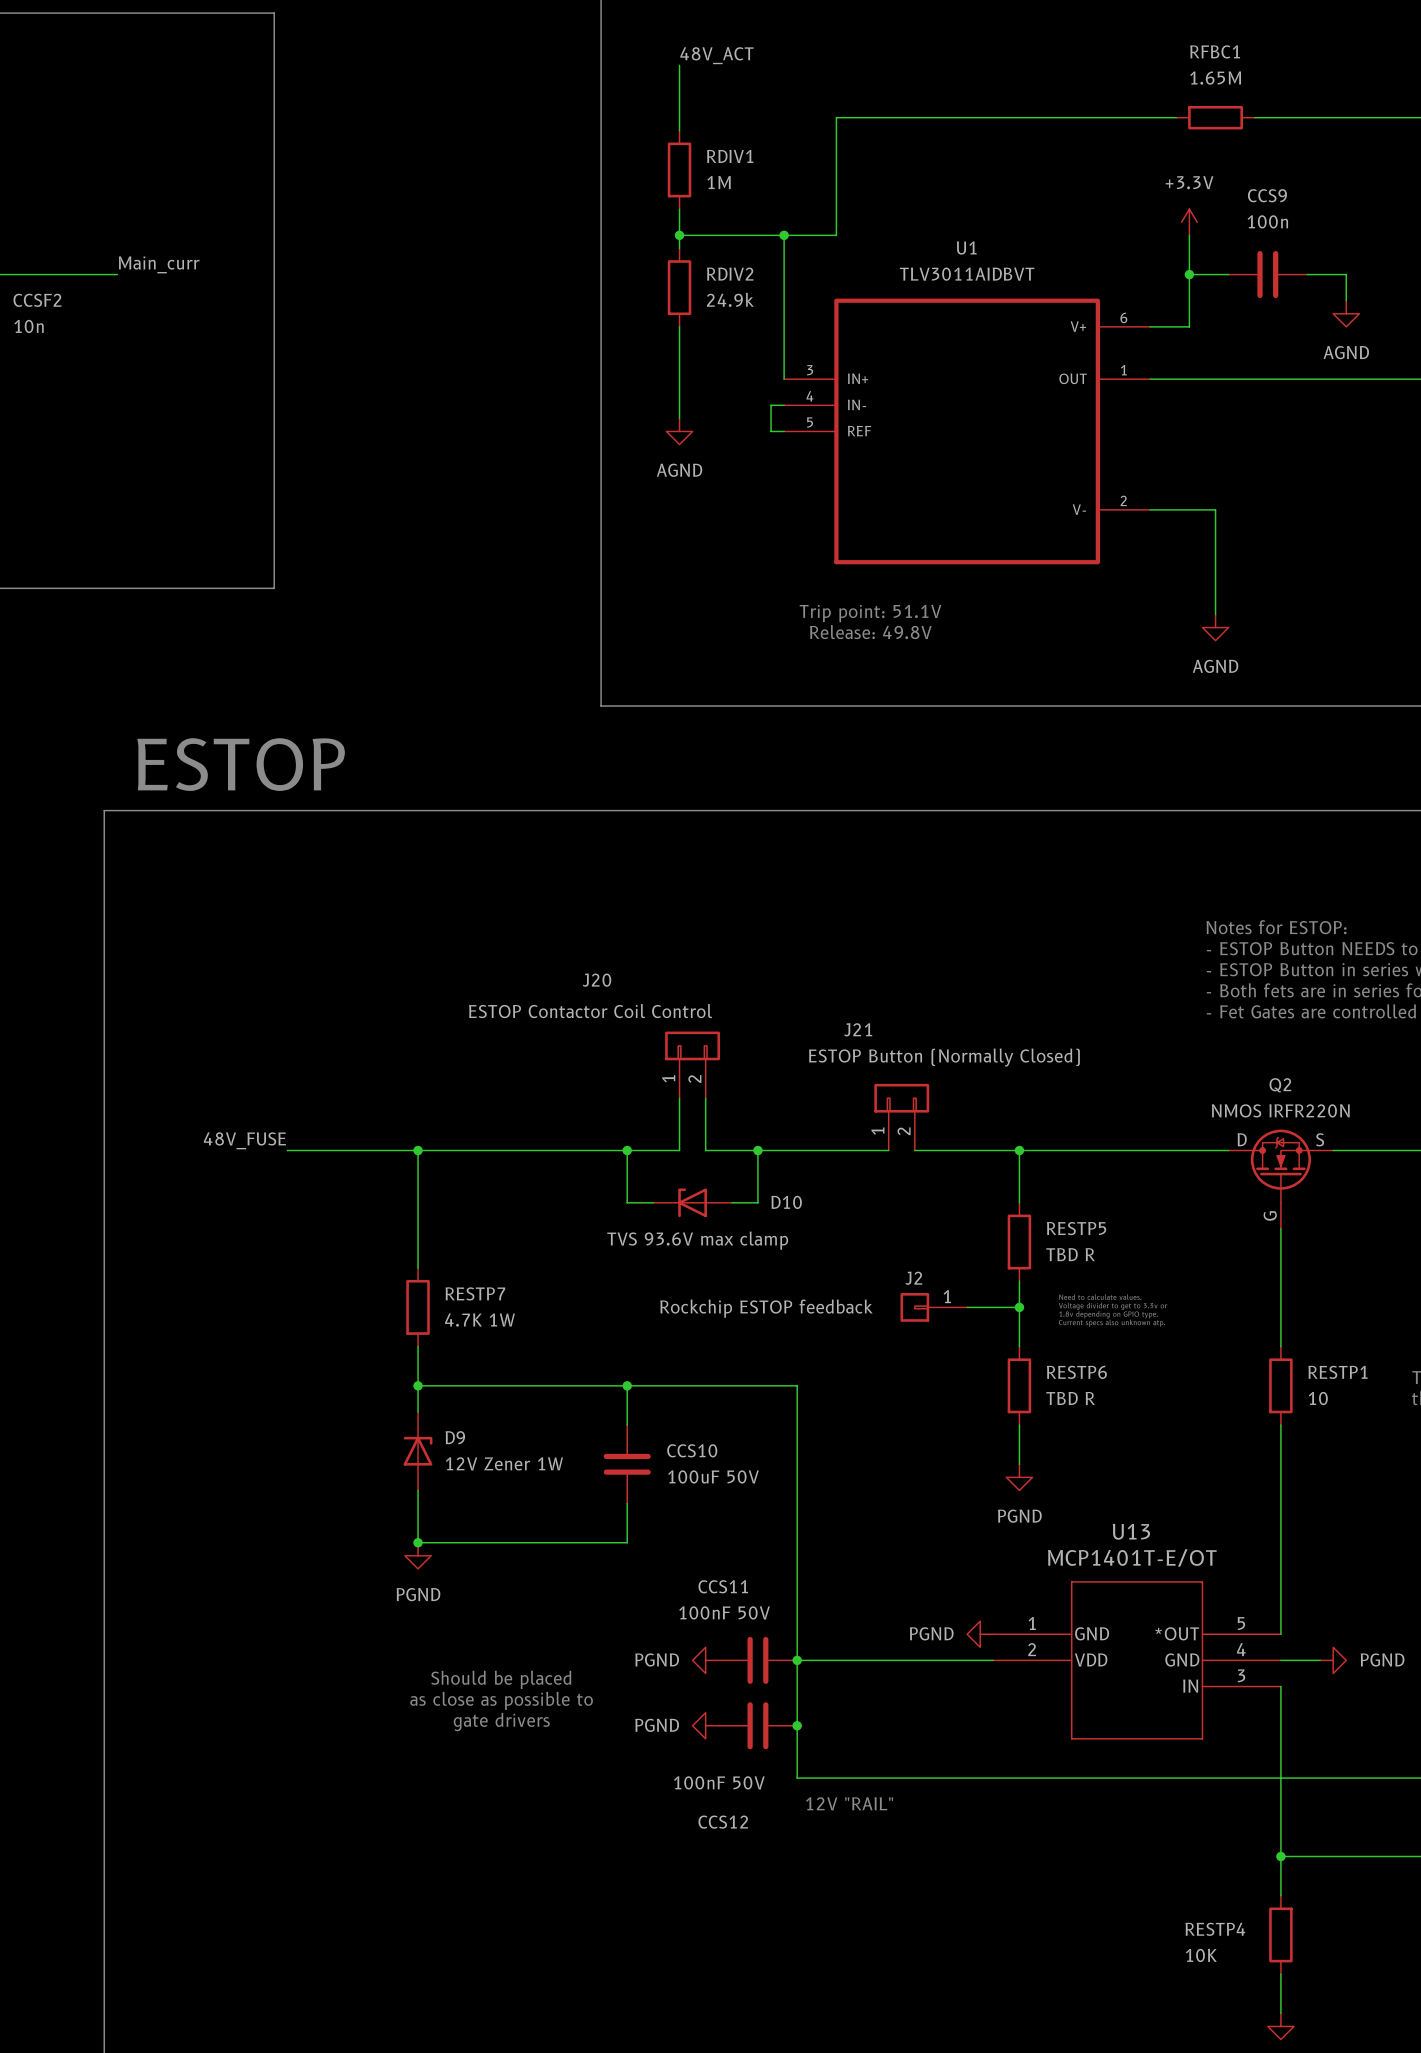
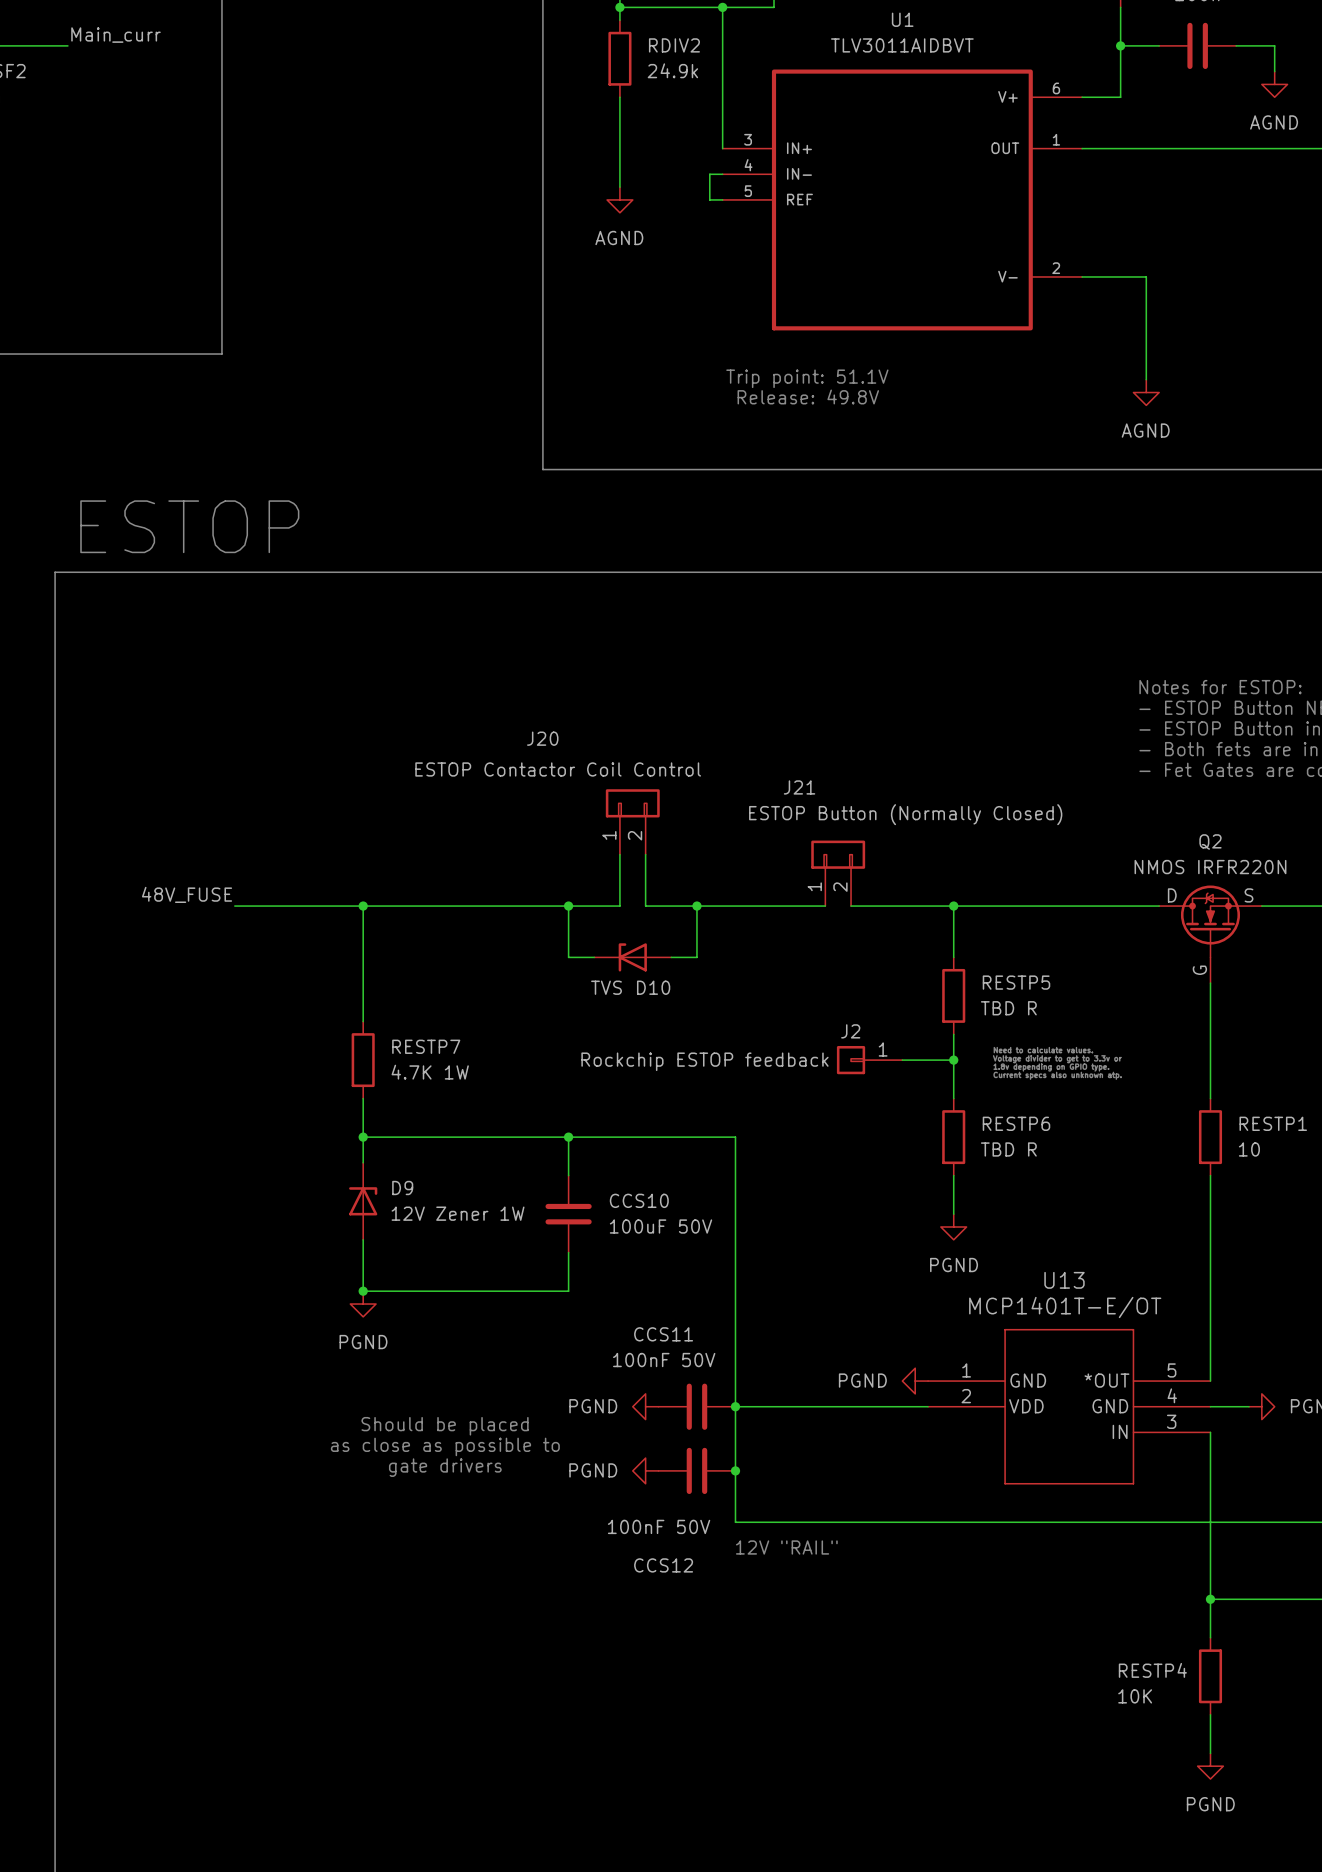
D10 name position: D10 (786, 1202) -> D10 (653, 987)
D10 value: TVS 93.6V max clamp (697, 1240) -> TVS (606, 987)

